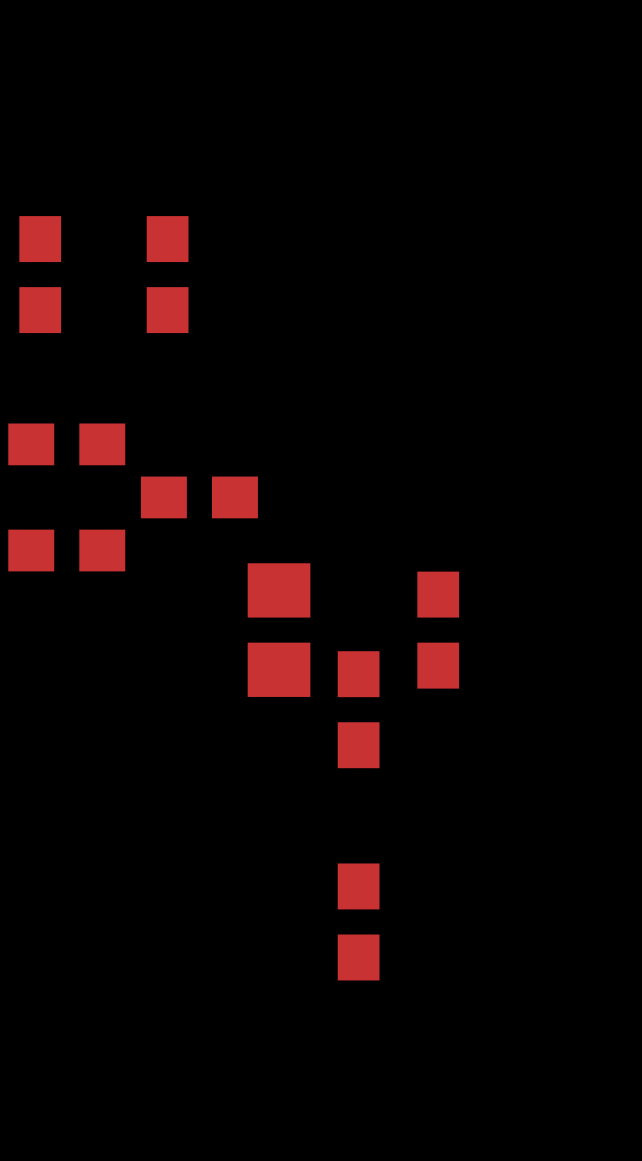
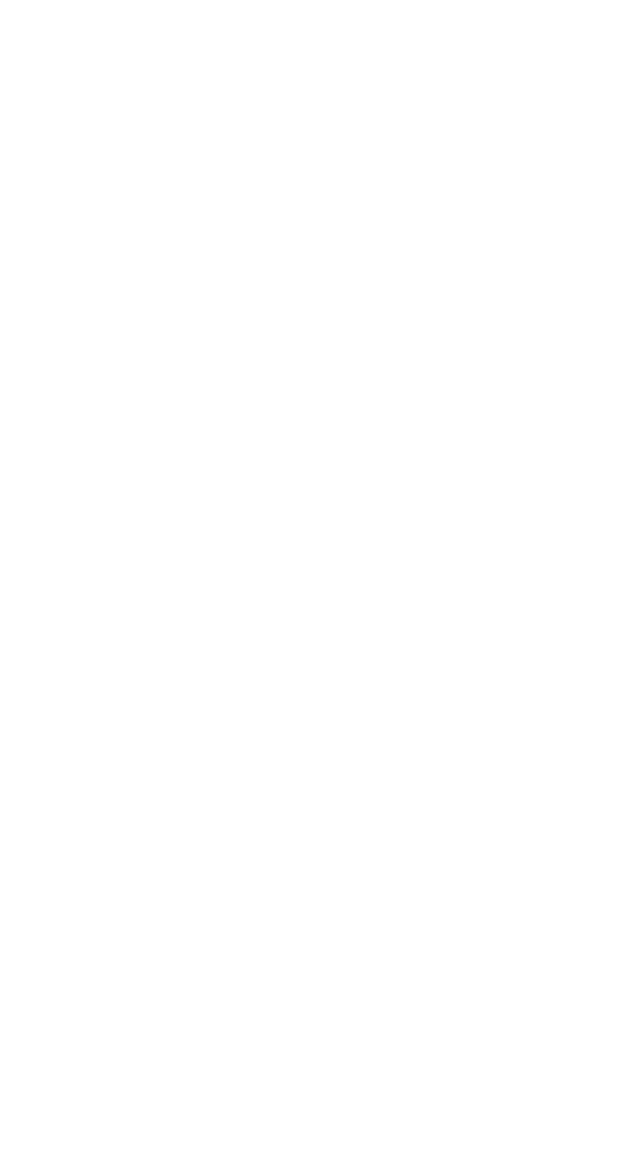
part: (40, 274) -> none
part: (167, 274) -> none
part: (66, 444) -> none
part: (199, 497) -> none
part: (66, 550) -> none
part: (279, 630) -> none
part: (438, 630) -> none
part: (358, 709) -> none
part: (358, 921) -> none

